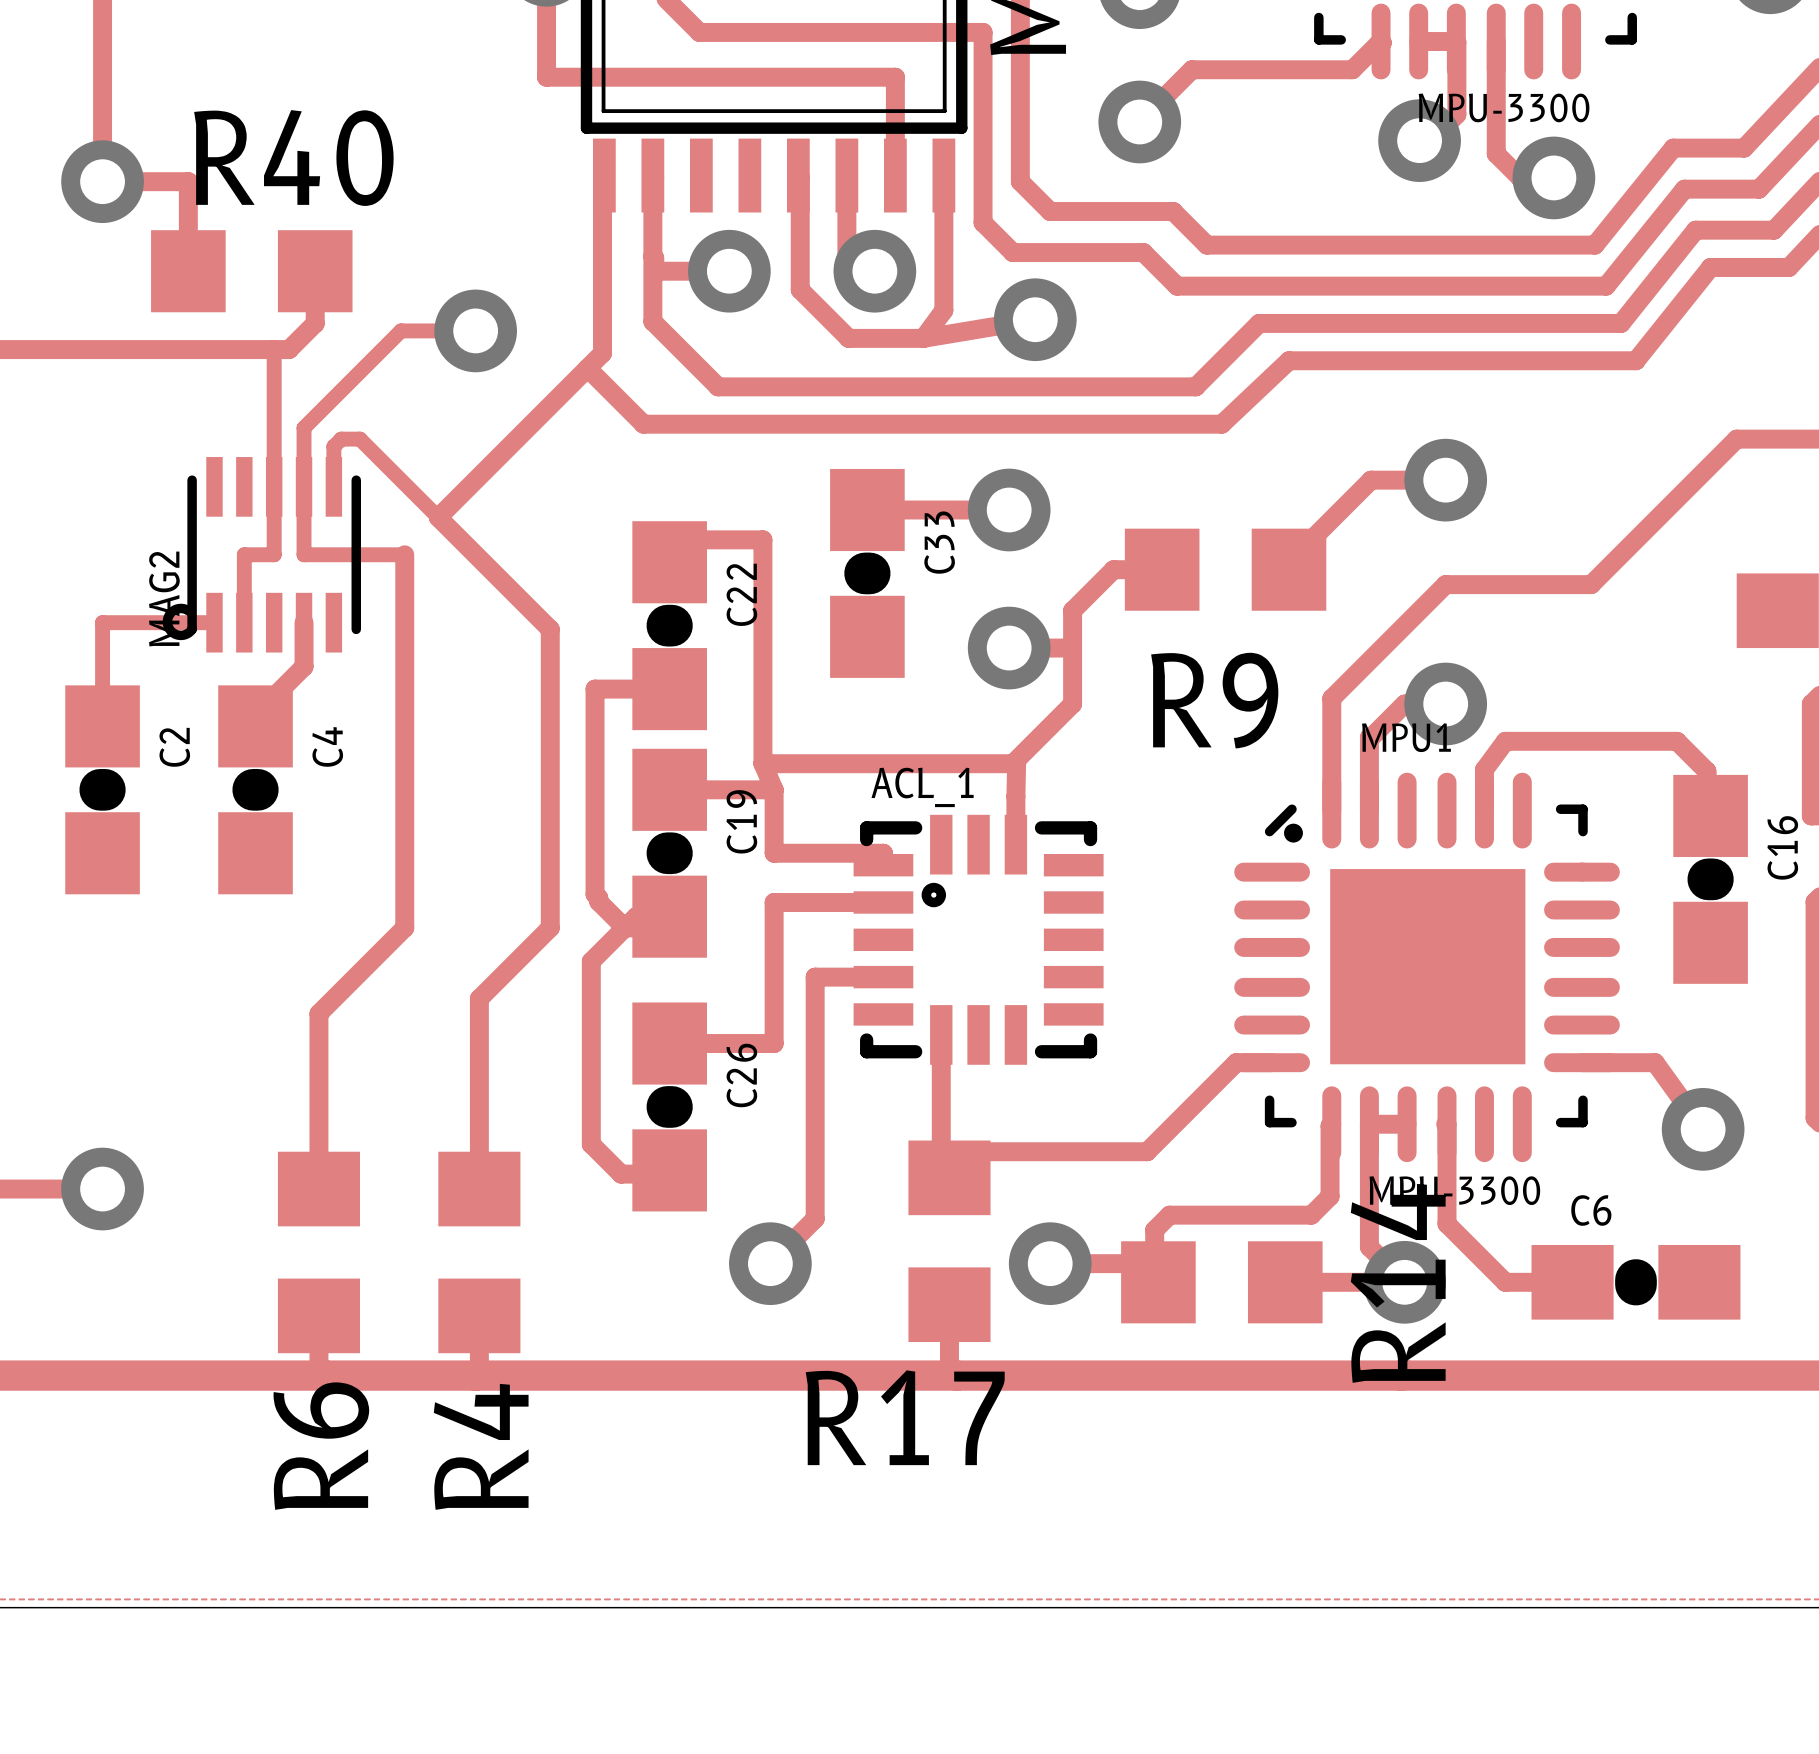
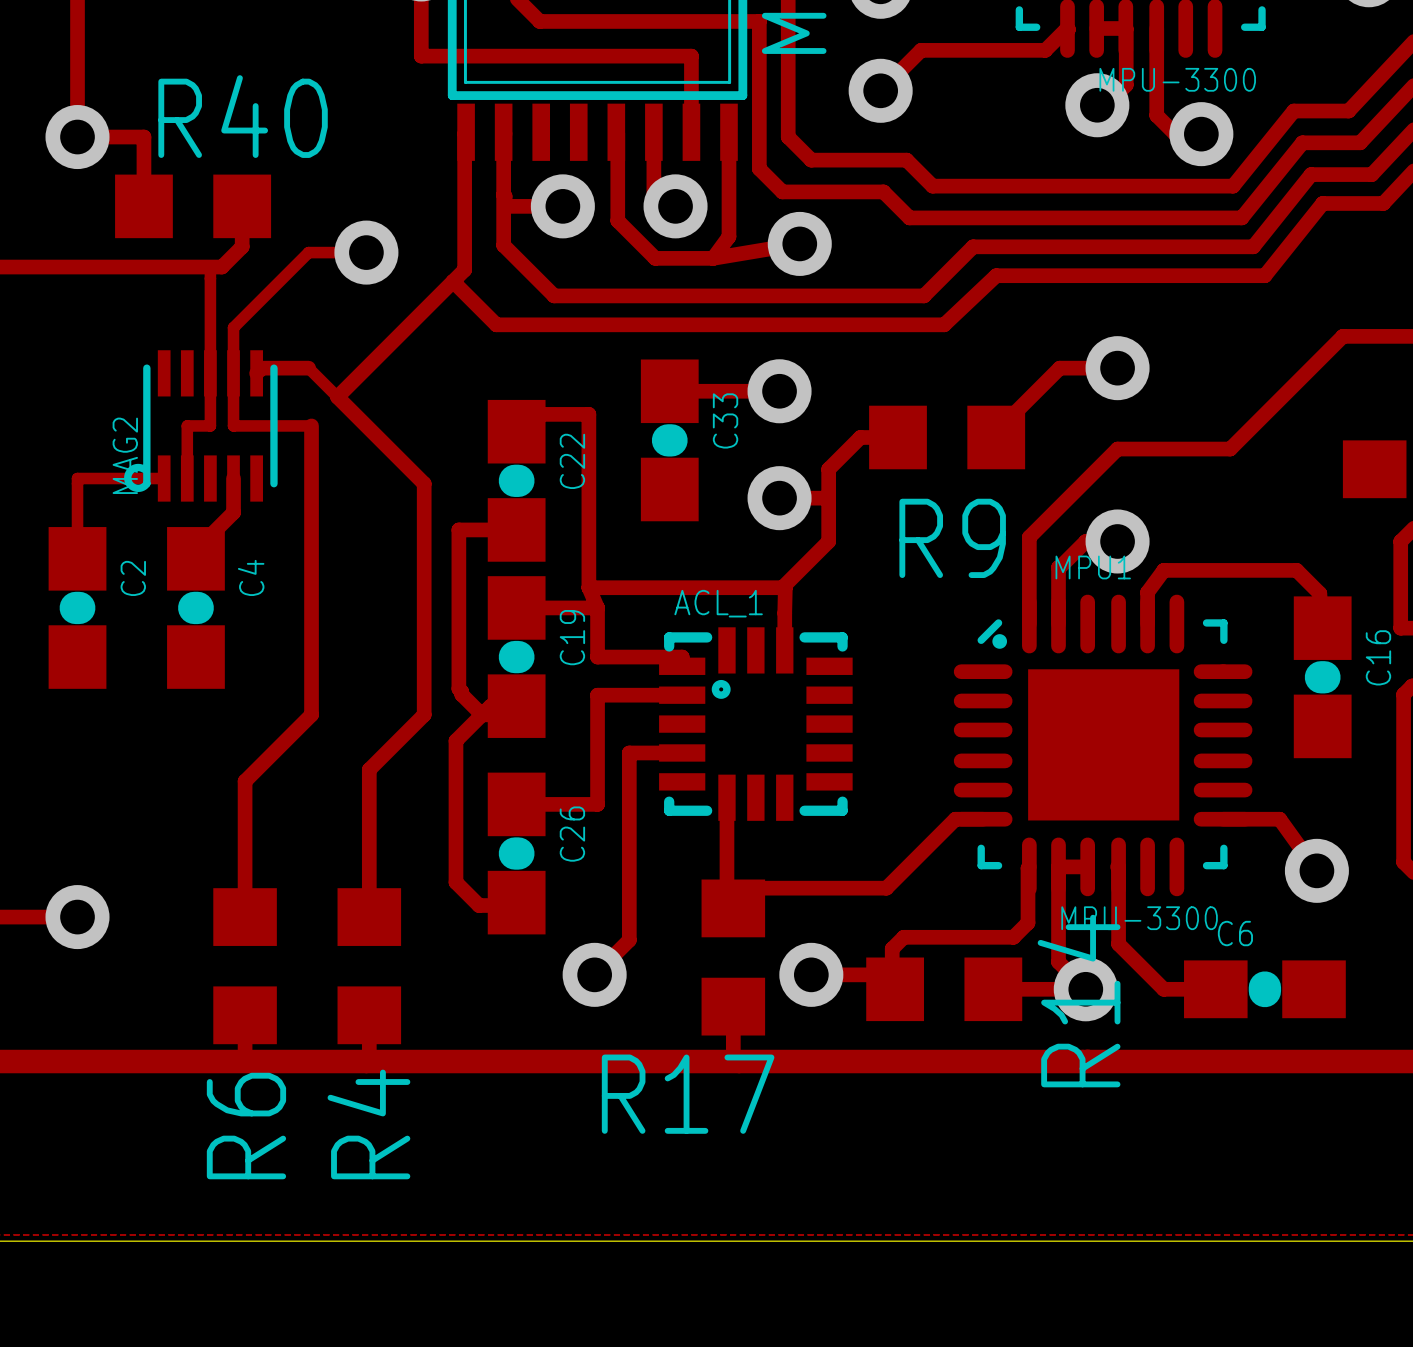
track: (401, 480) (359, 439) (341, 439) (333, 446) (333, 486) -> (308, 368) (261, 368) (256, 373)

